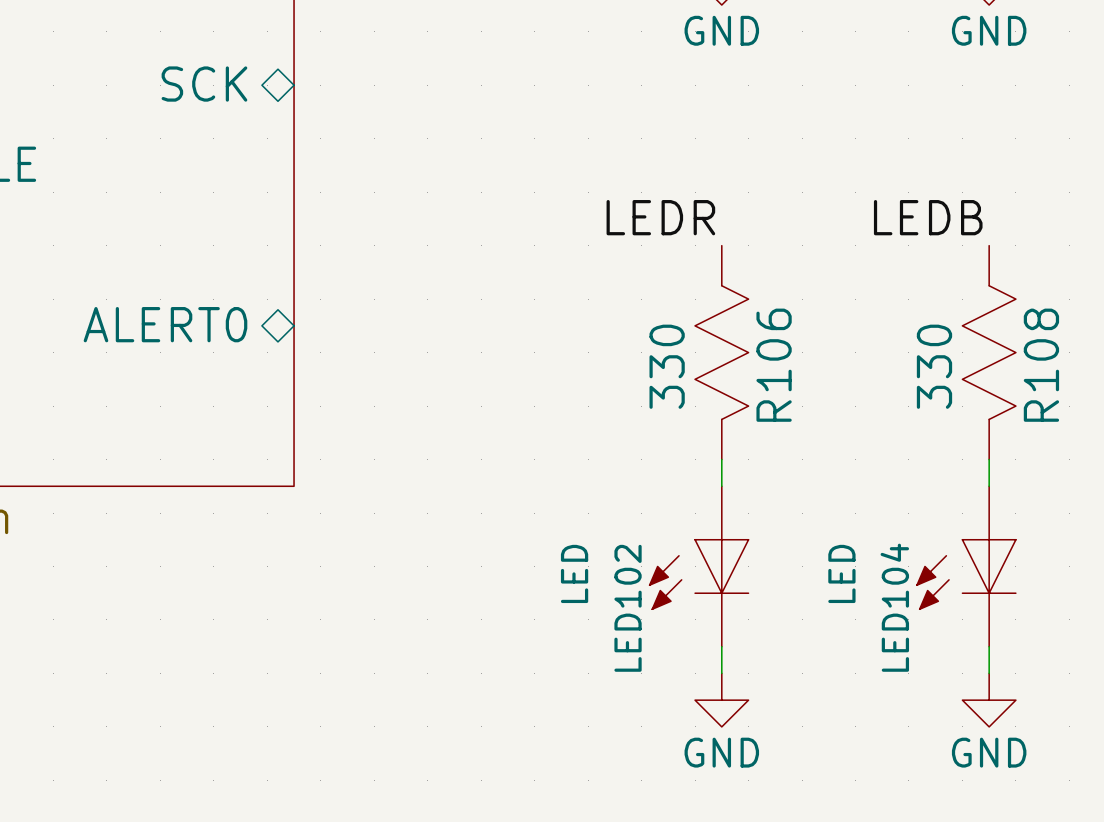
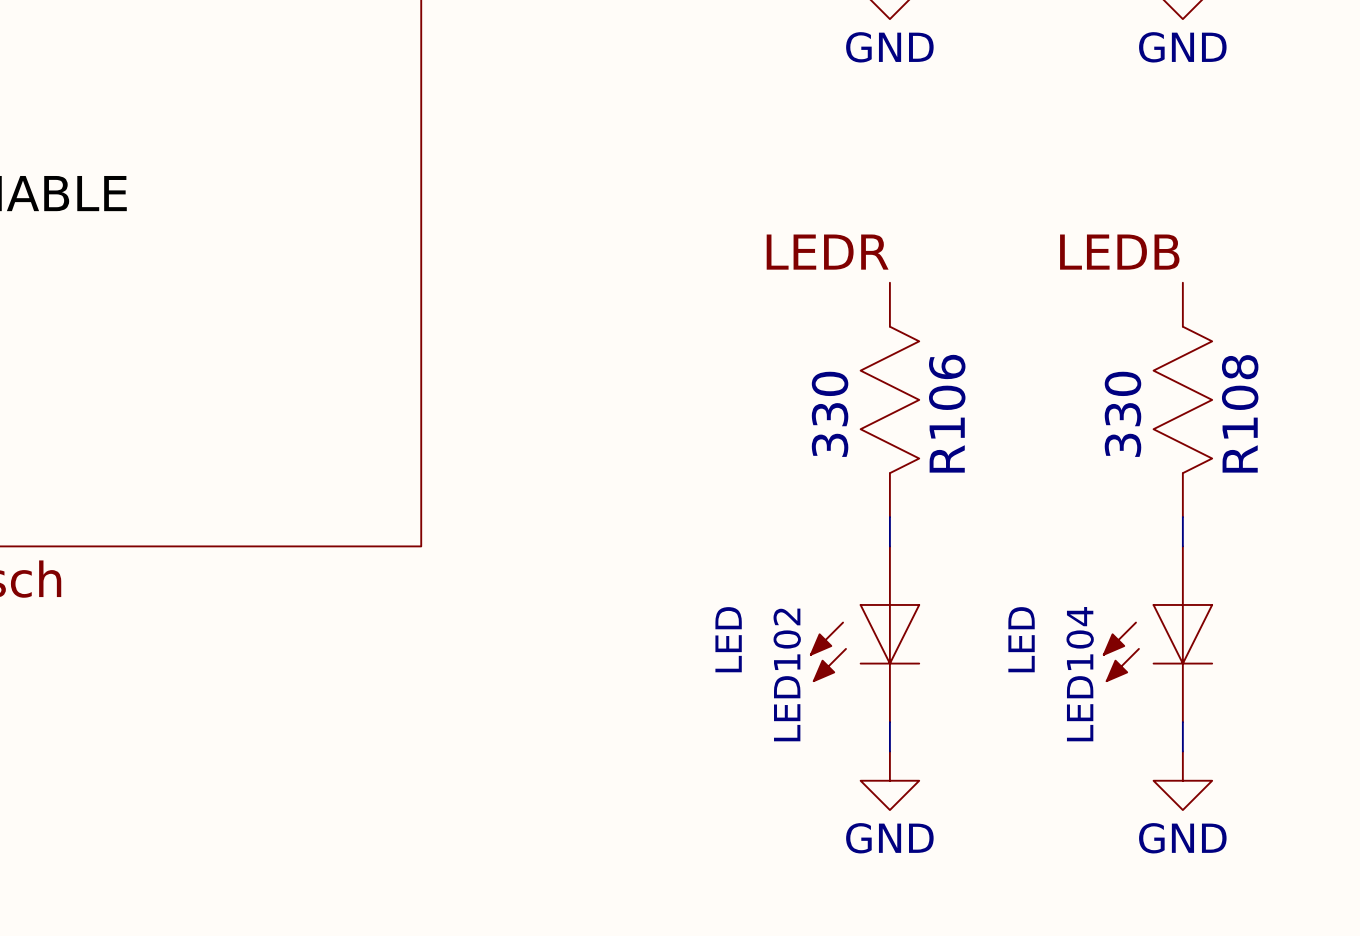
sheet pin: SCK (204, 84) -> none
sheet pin: ALERT0 (165, 324) -> none

